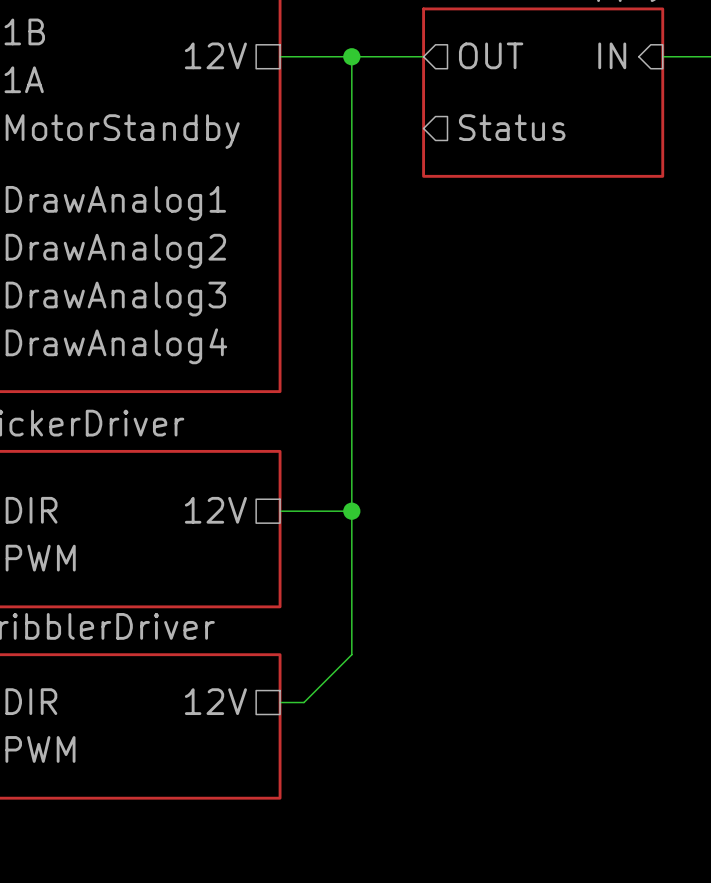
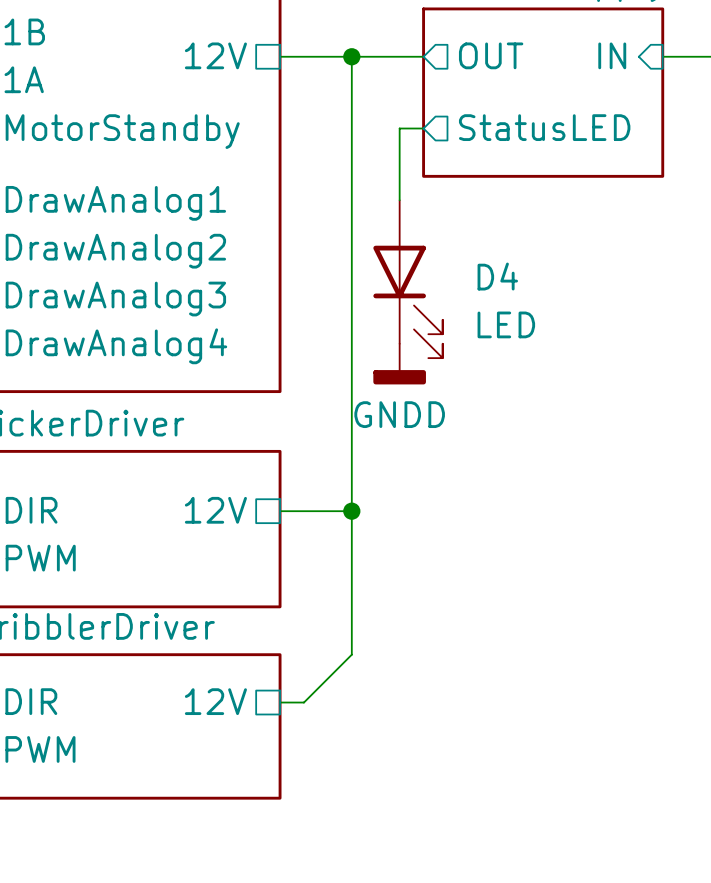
sheet pin: Status (512, 127) -> StatusLED (544, 127)
wire: none -> (423, 128) (399, 128) (399, 200)
D4: none -> LED (408, 279)
power symbol: none -> GNDD (399, 364)

